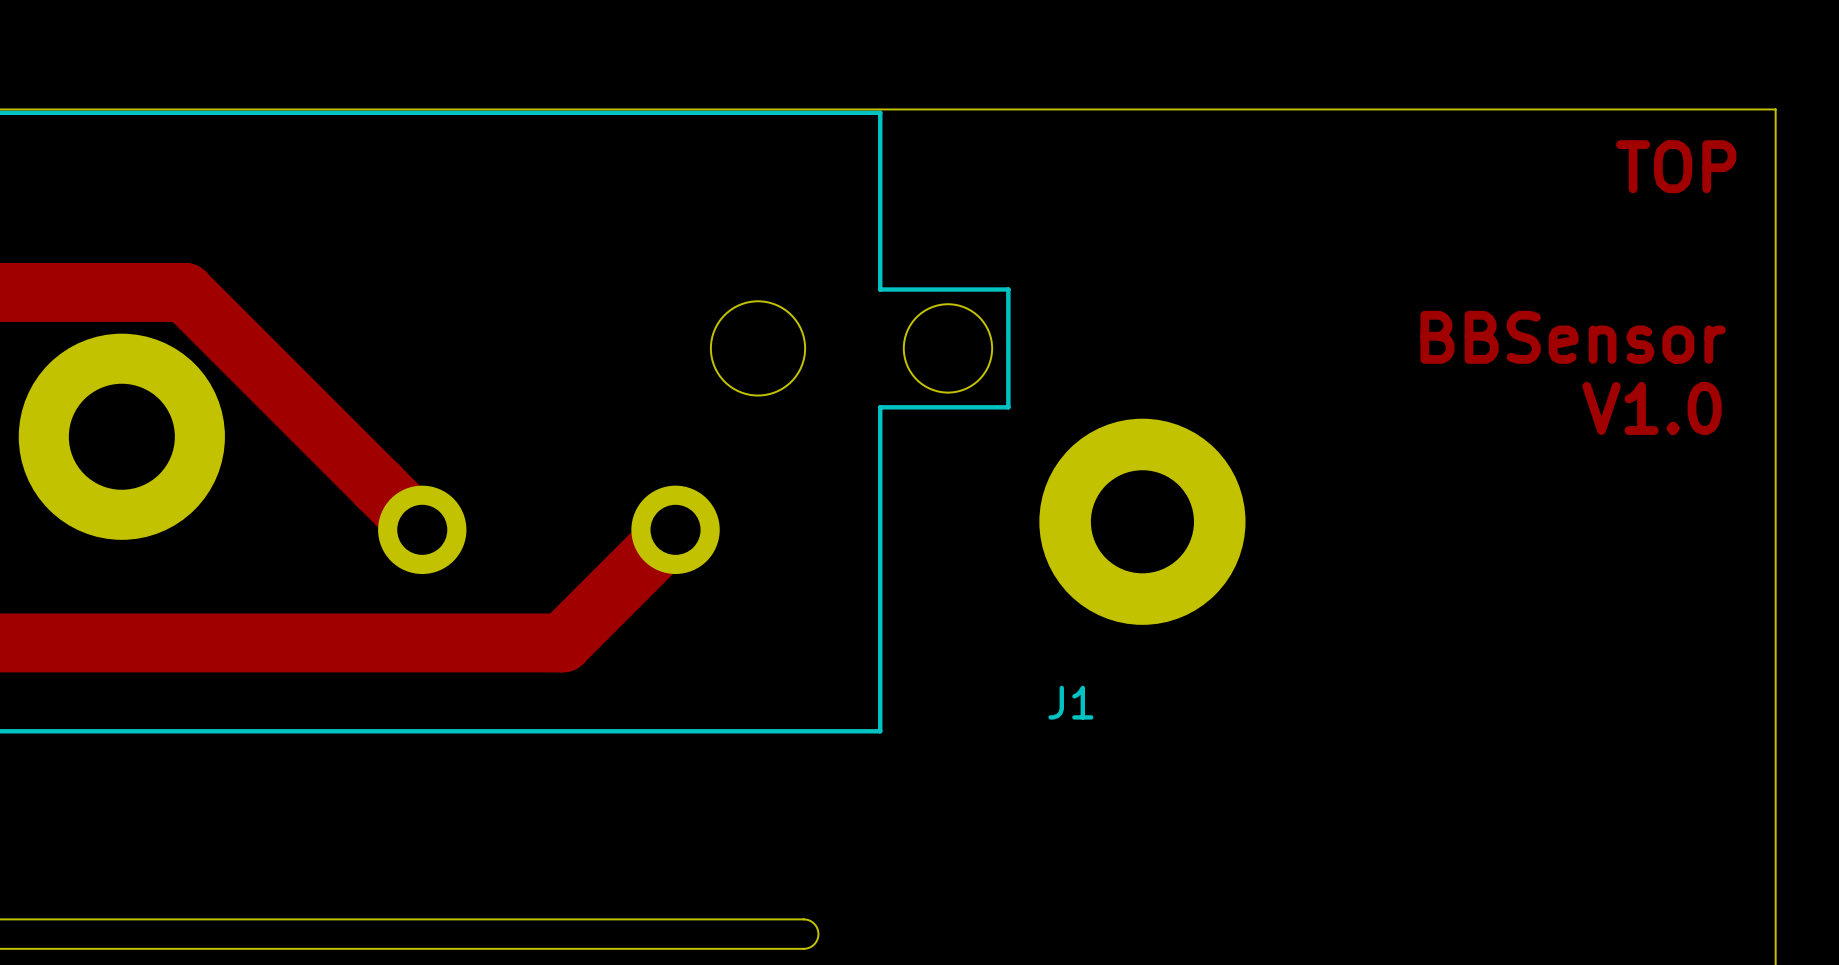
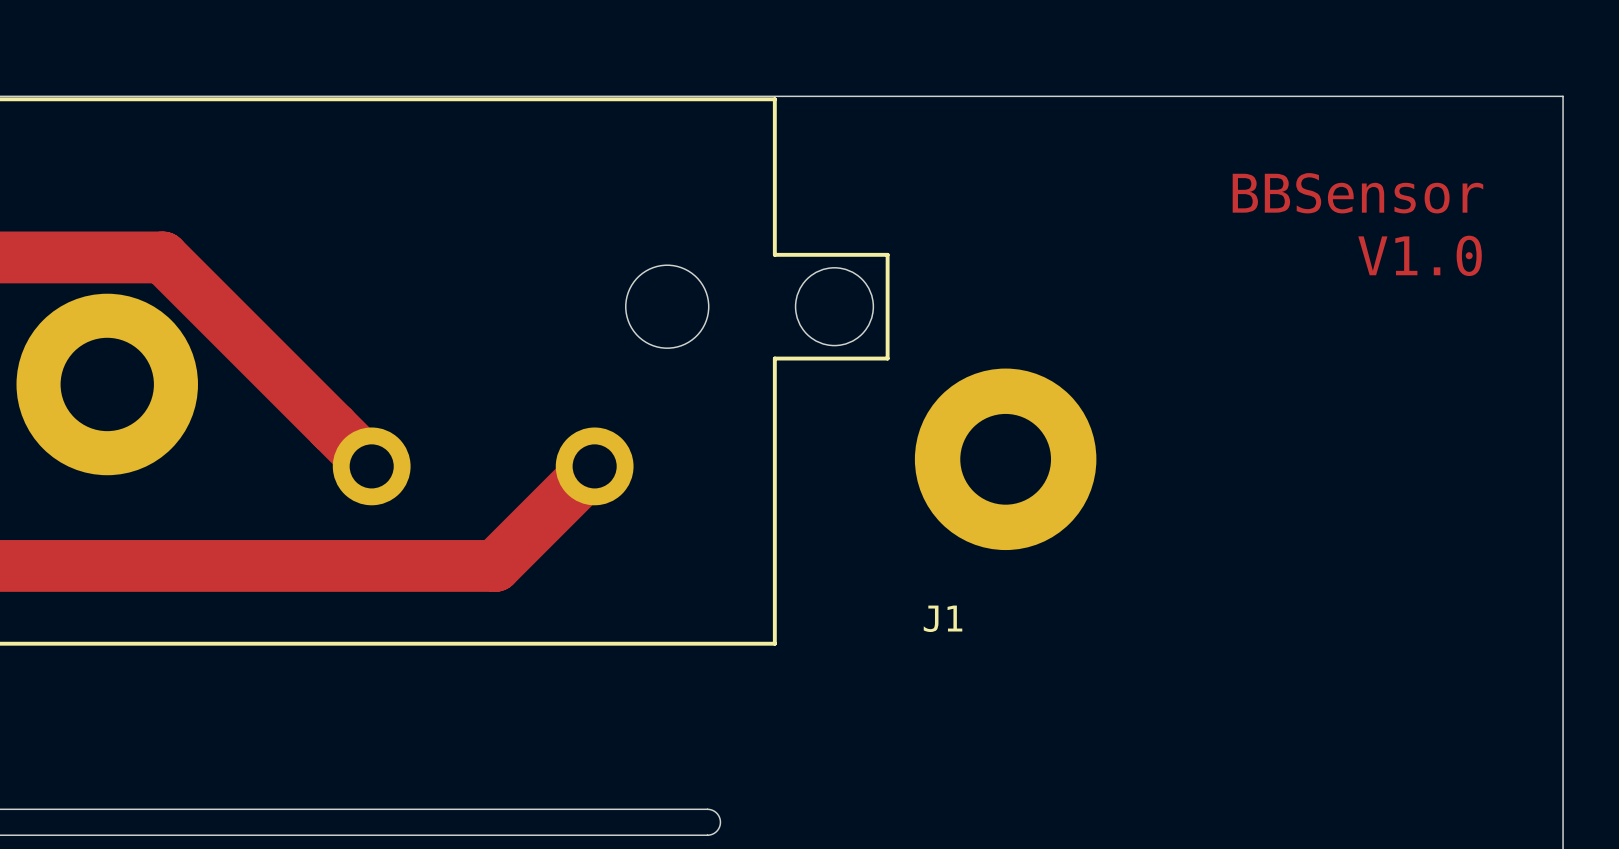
text: TOP (1676, 166) -> none
text position: BBSensor (1573, 337) -> BBSensor (1357, 193)
text position: V1.0 (1652, 408) -> V1.0 (1420, 255)

